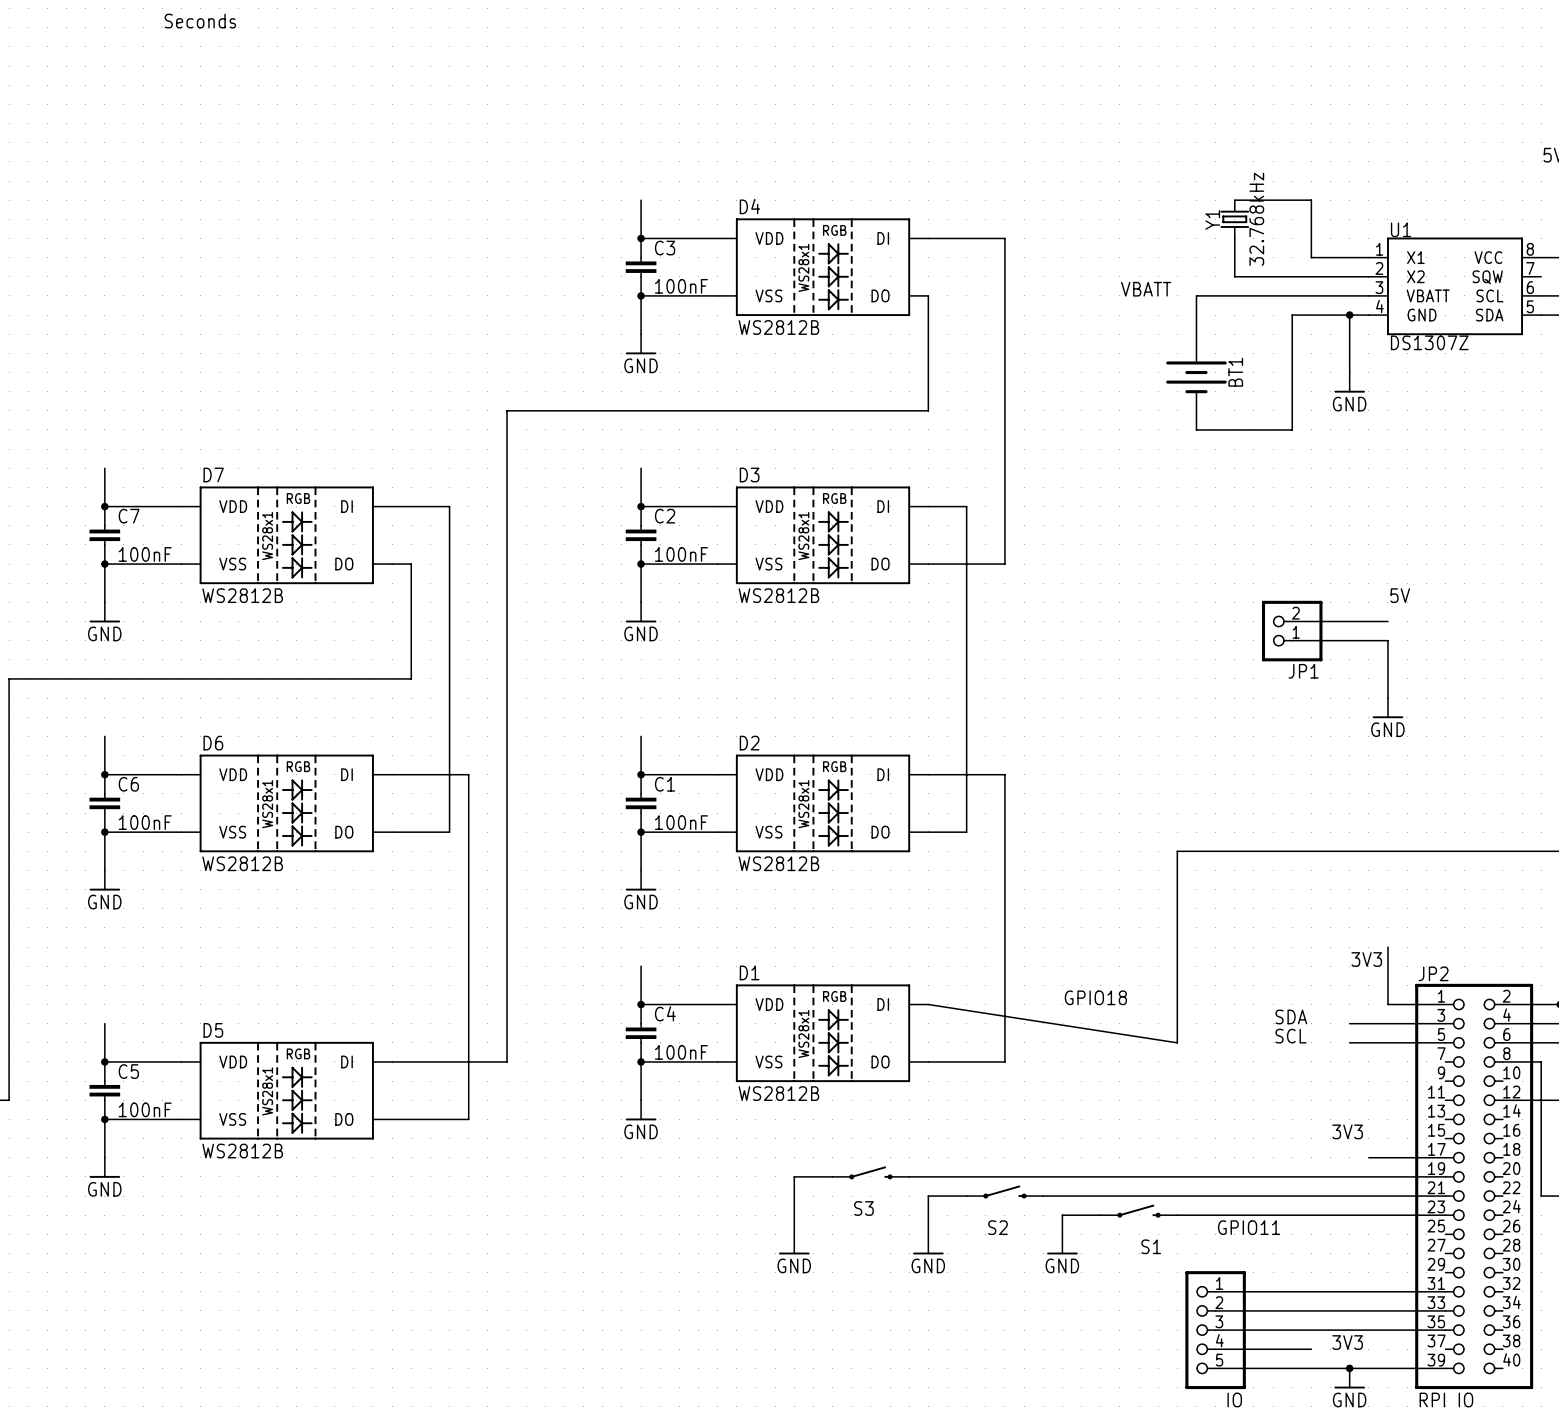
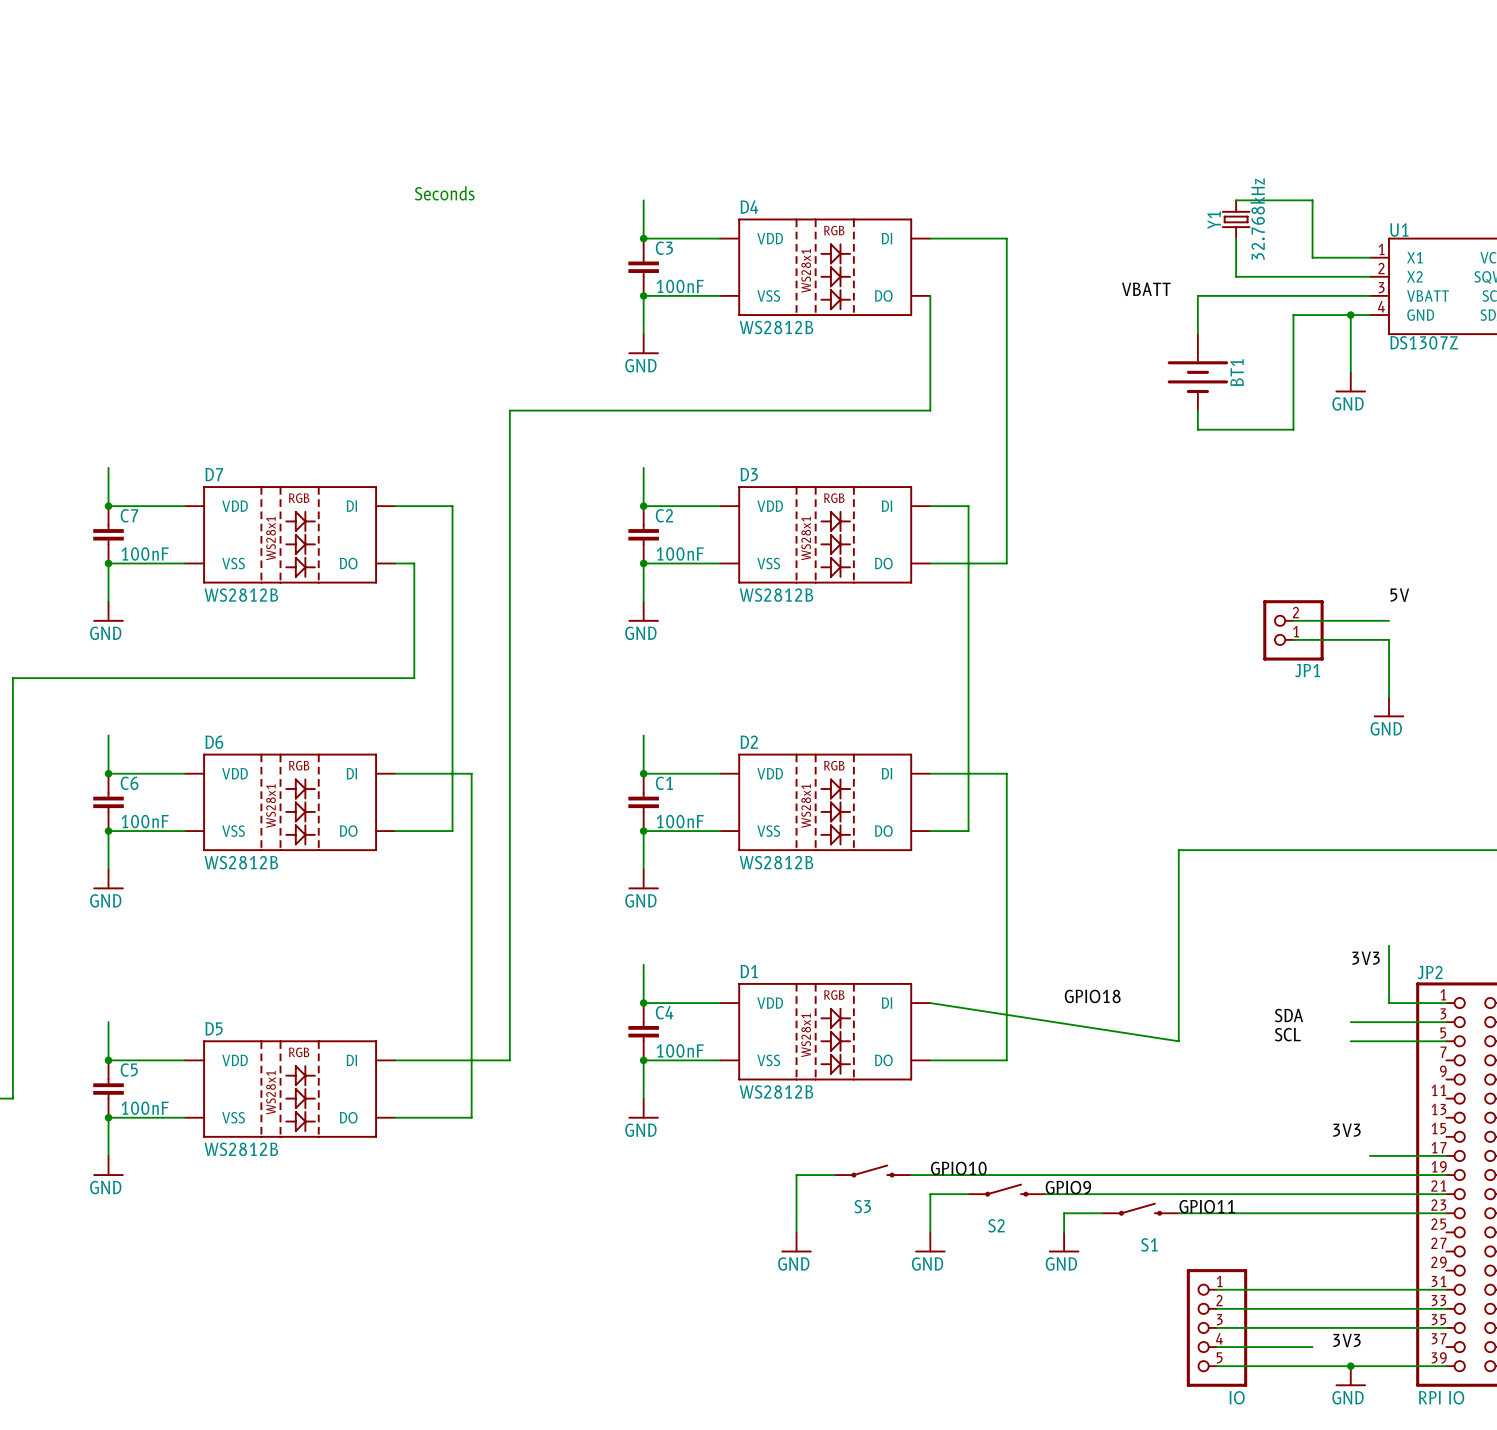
text: Seconds (200, 21) -> none
text: none -> Seconds (444, 193)
label: none -> GPIO10 (958, 1168)
label: none -> GPIO9 (1068, 1187)
label position: GPIO11 (1249, 1227) -> GPIO11 (1207, 1206)

